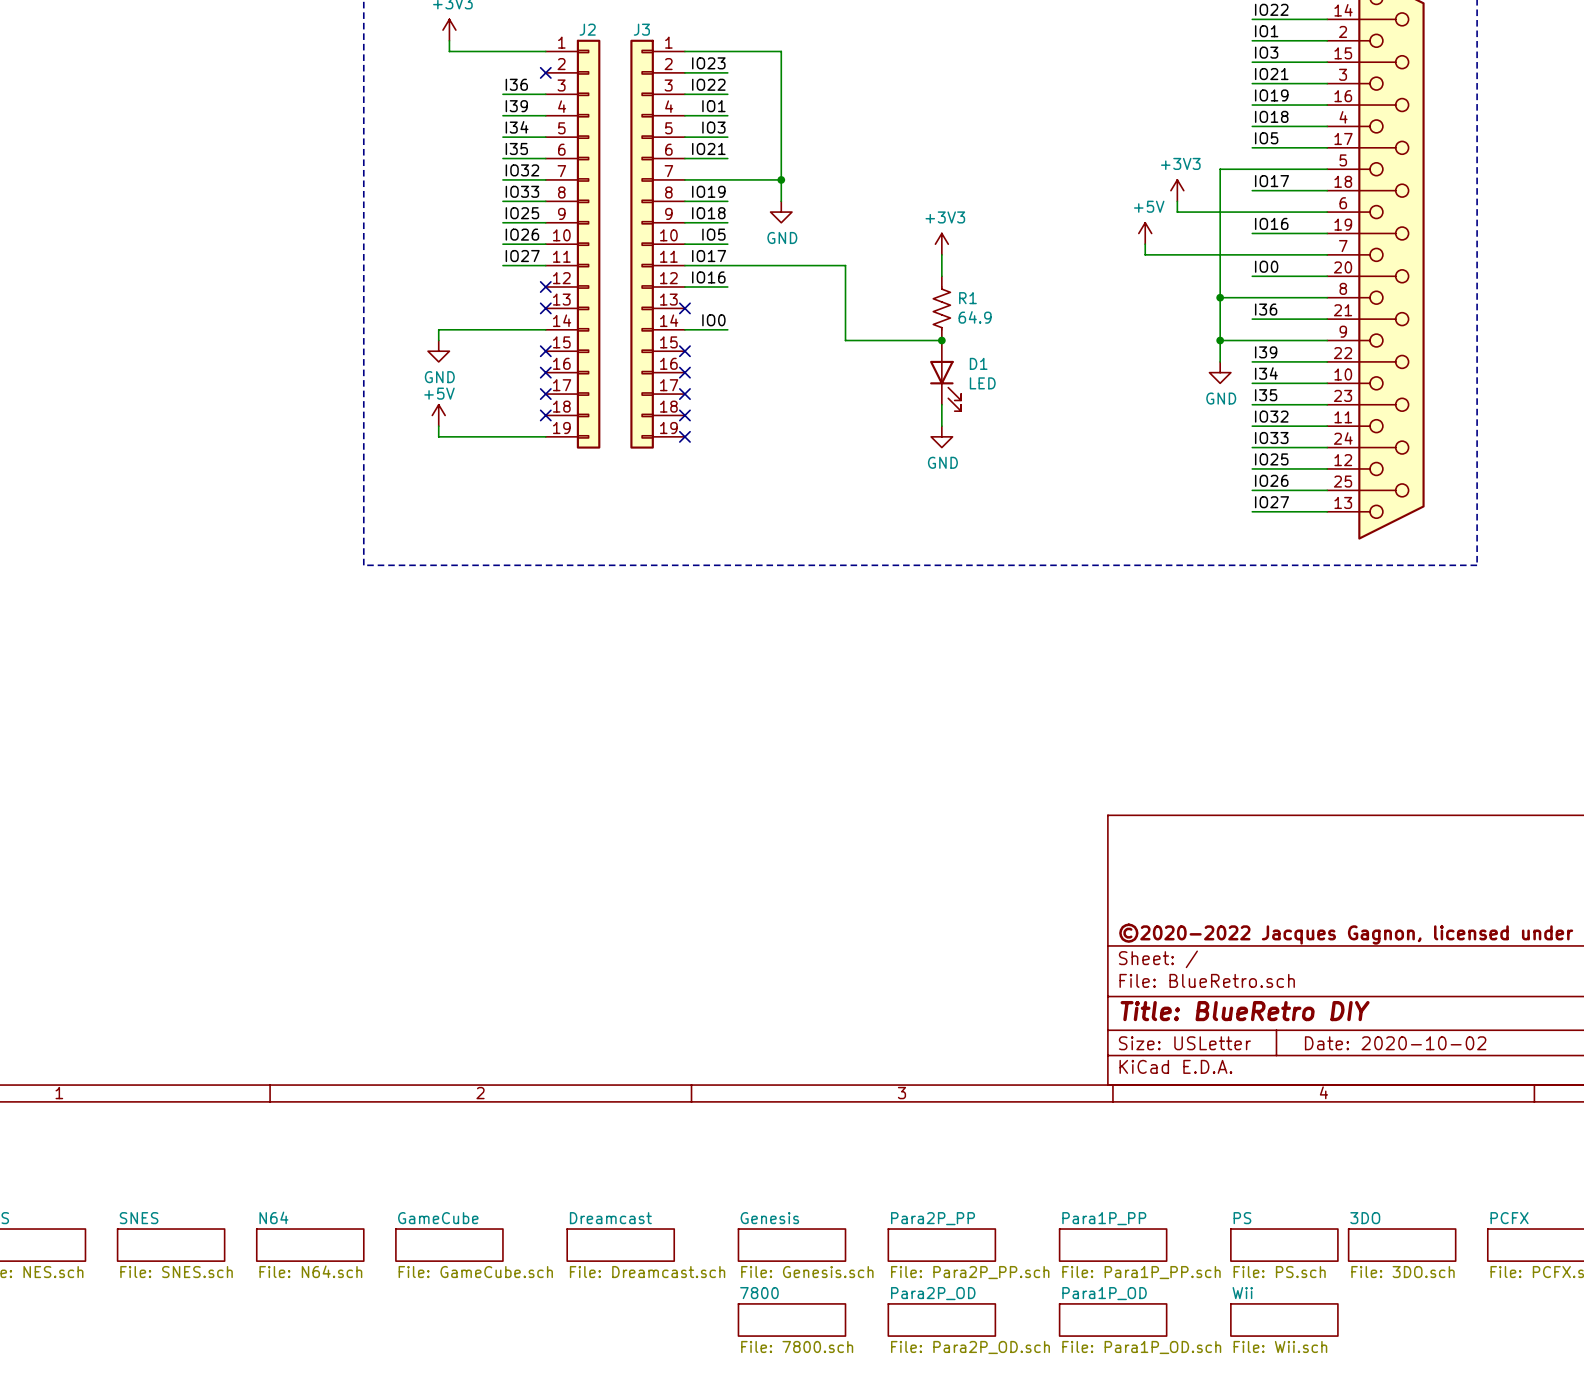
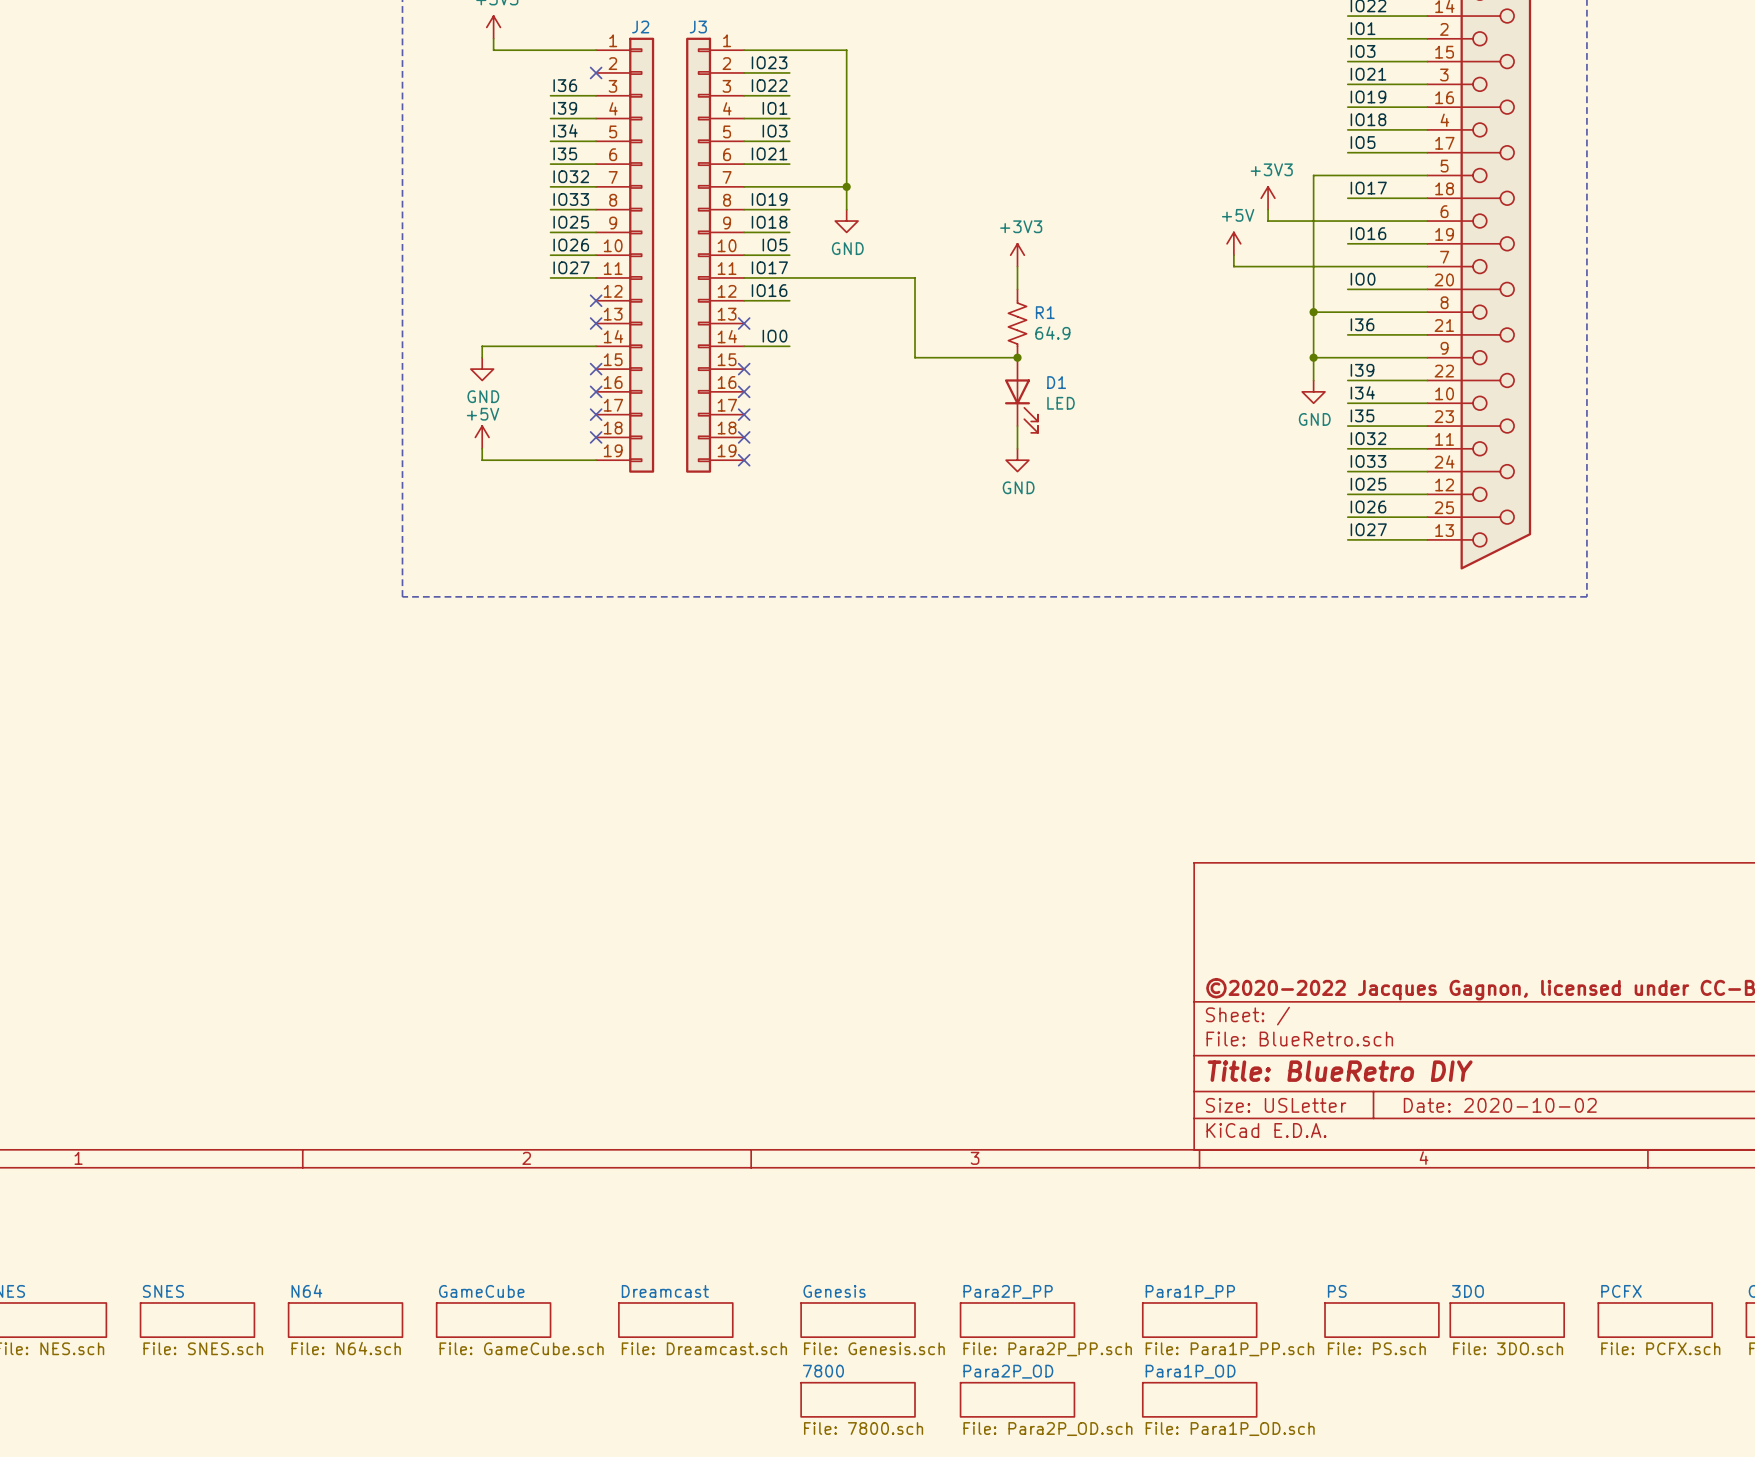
sheet Wii: File: Wii.sch (1284, 1320) -> none

